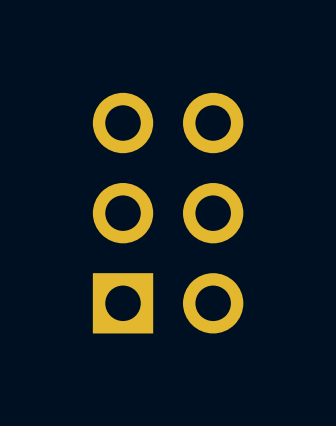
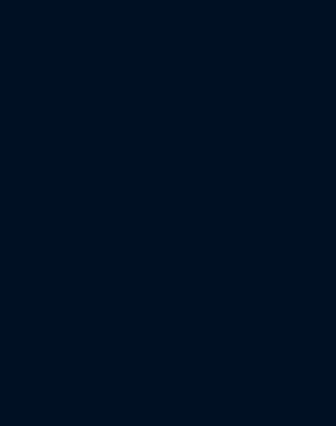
part: (168, 213) -> none

